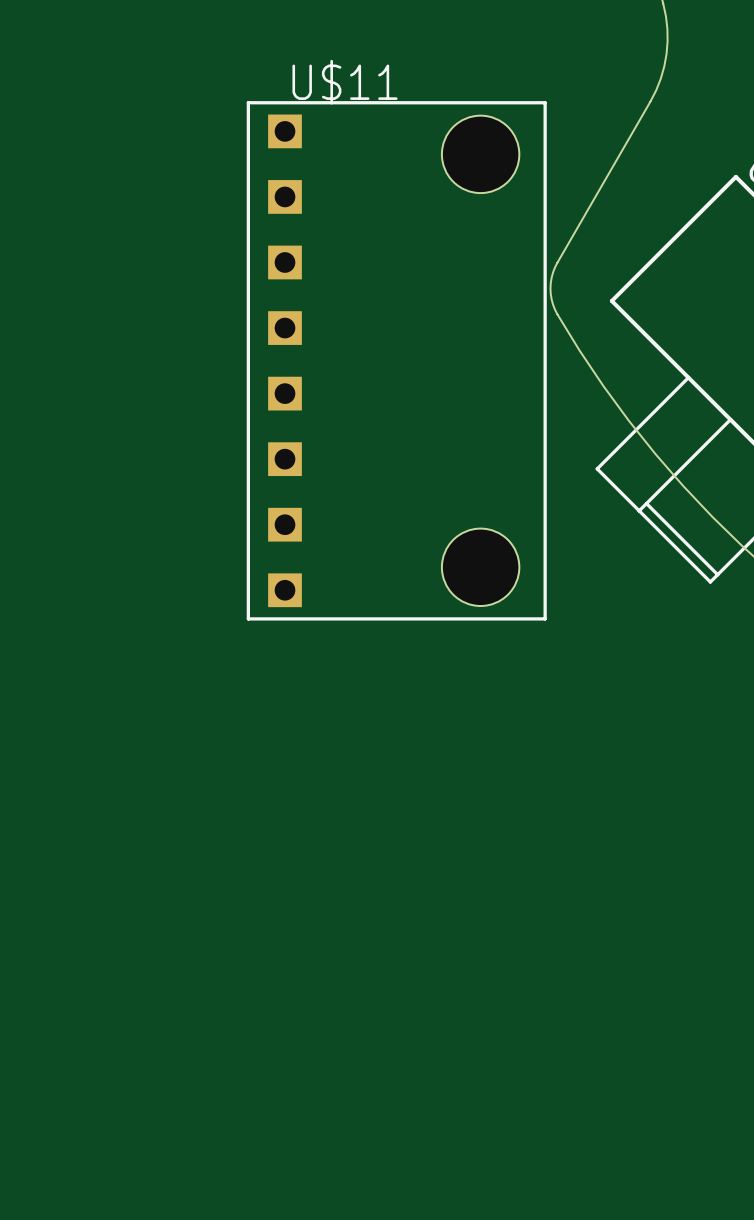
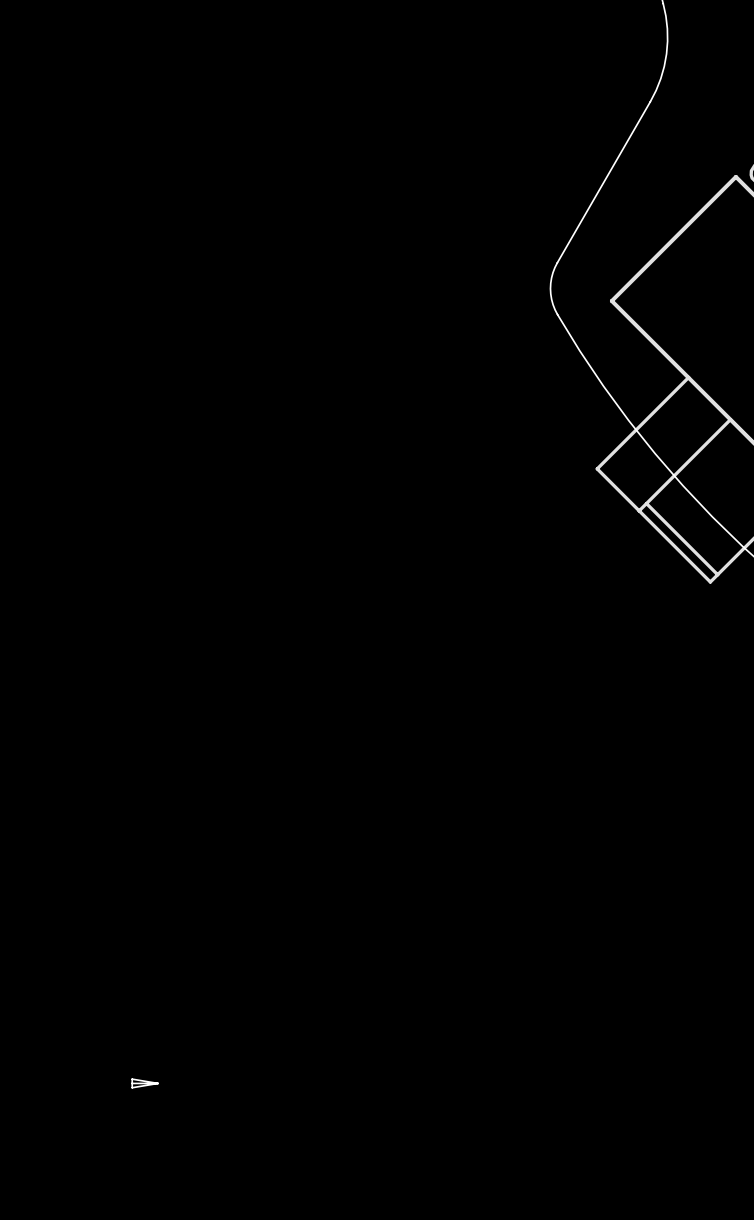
U$11: (396, 360) -> none
board edge: none -> (132, 1083) (158, 1083)
board edge: none -> (158, 1083) (132, 1079) (132, 1087) (158, 1083)

